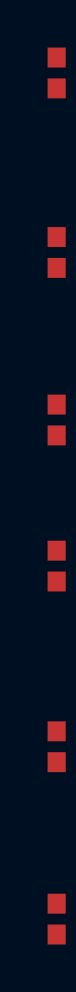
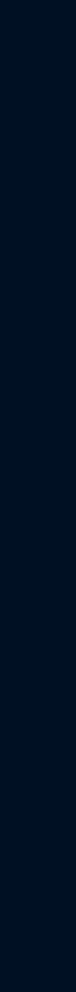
part: (56, 72) -> none
part: (56, 252) -> none
part: (56, 419) -> none
part: (56, 566) -> none
part: (56, 746) -> none
part: (56, 919) -> none

